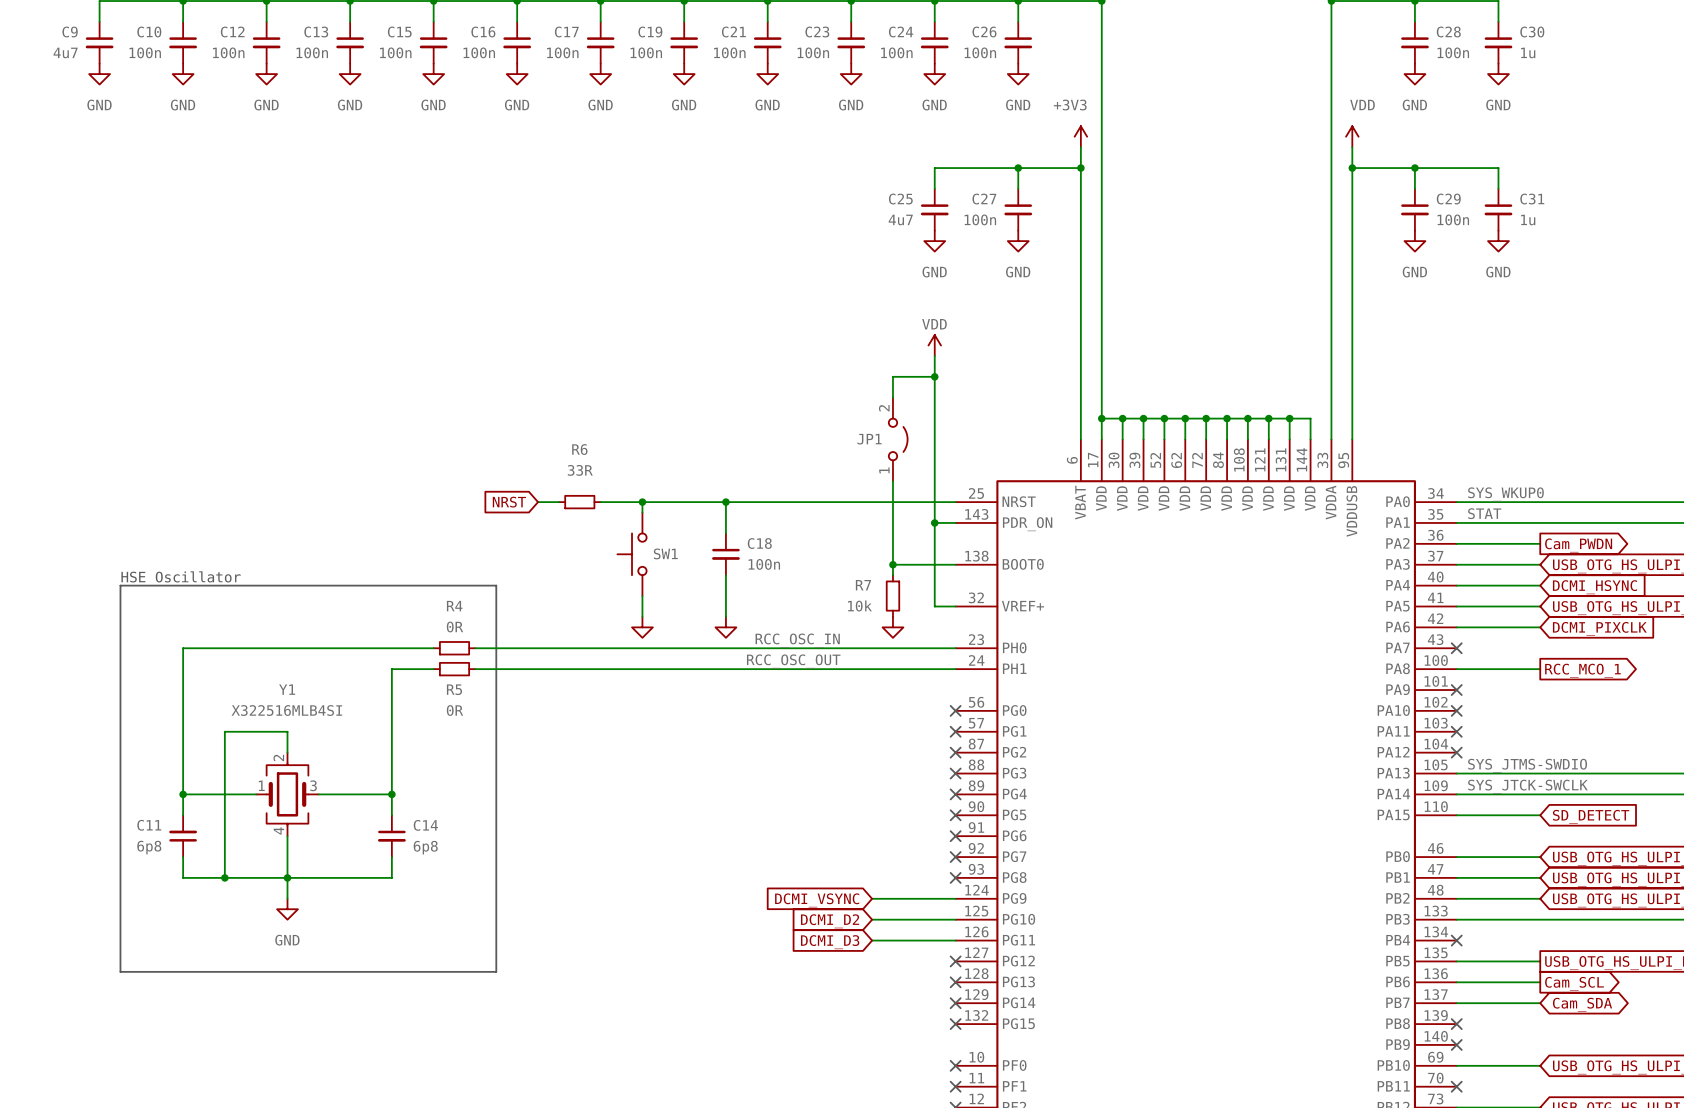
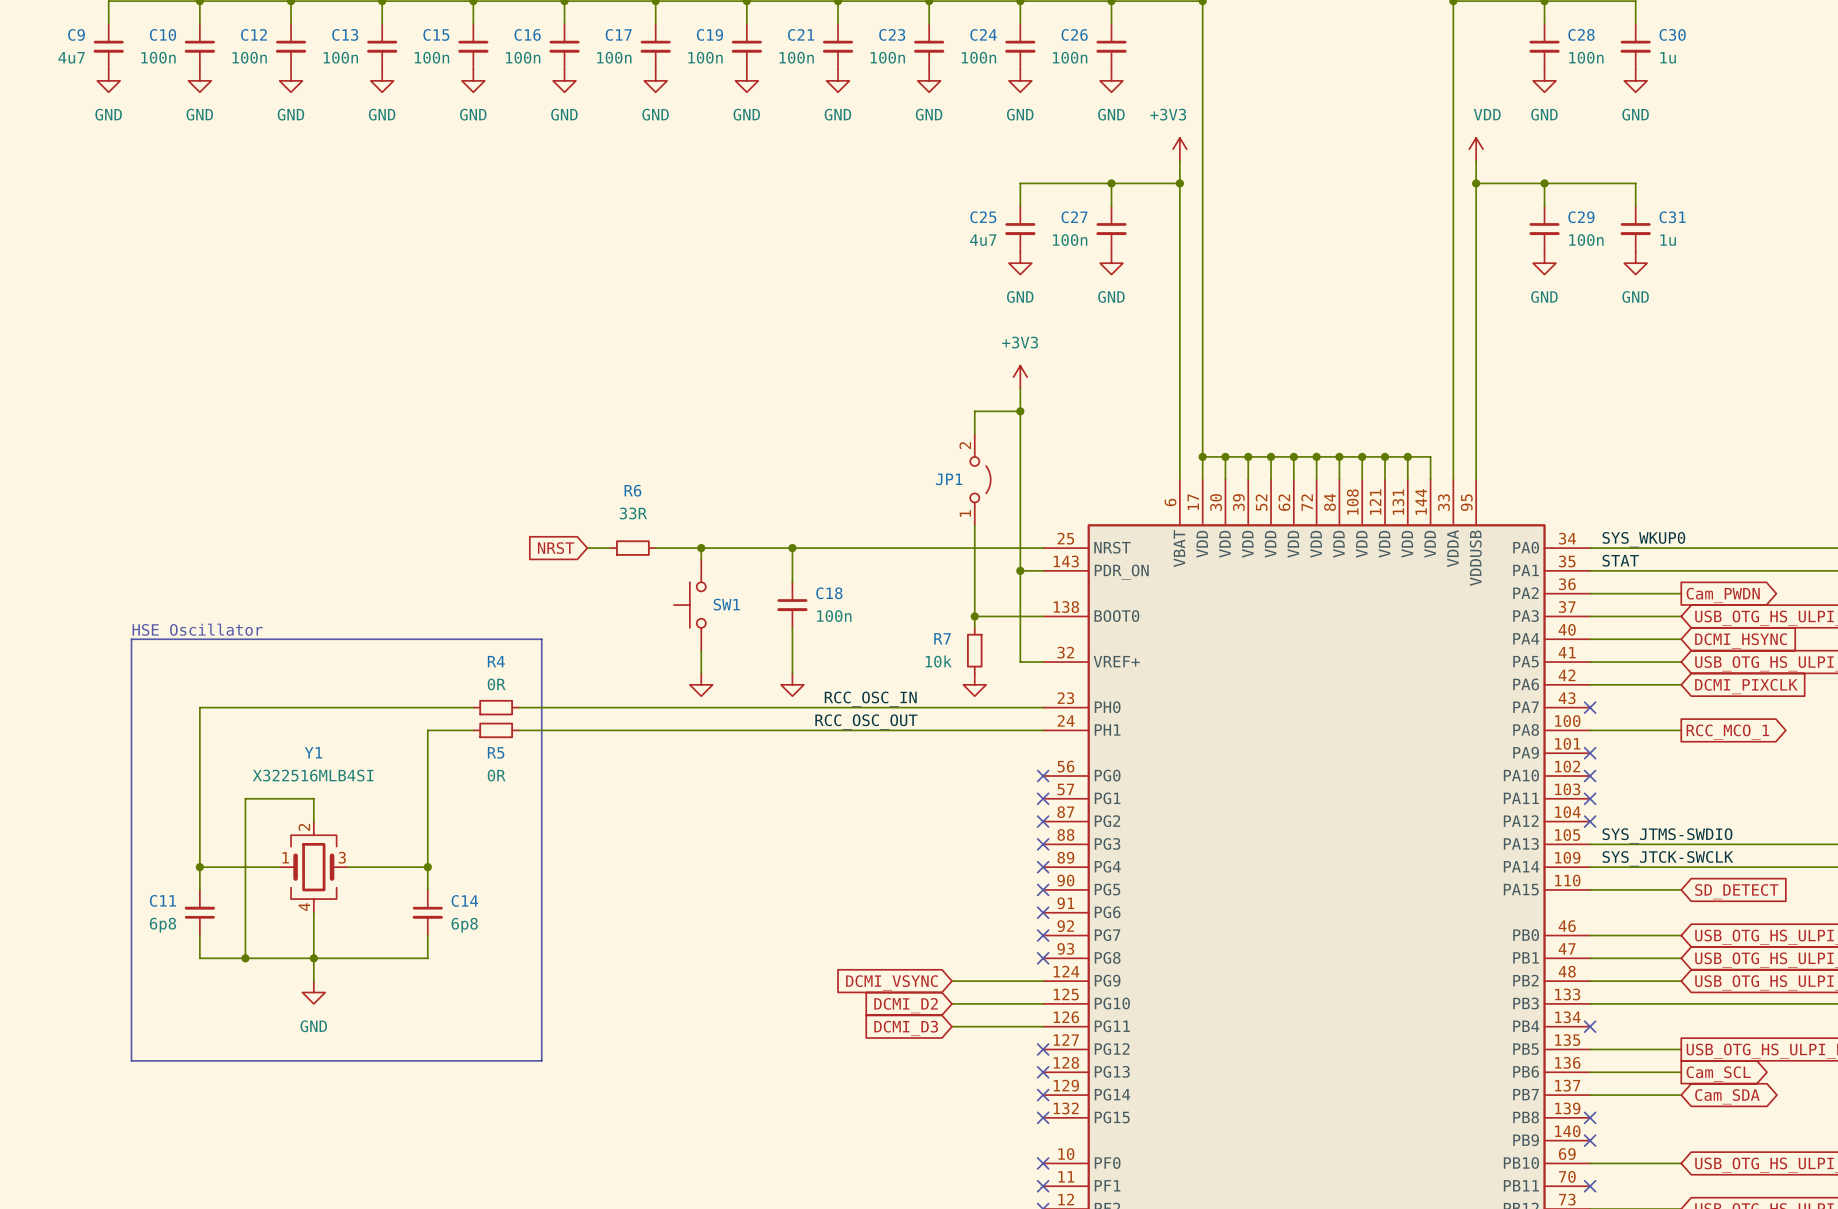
power symbol: VDD (934, 345) -> +3V3 (1020, 377)

